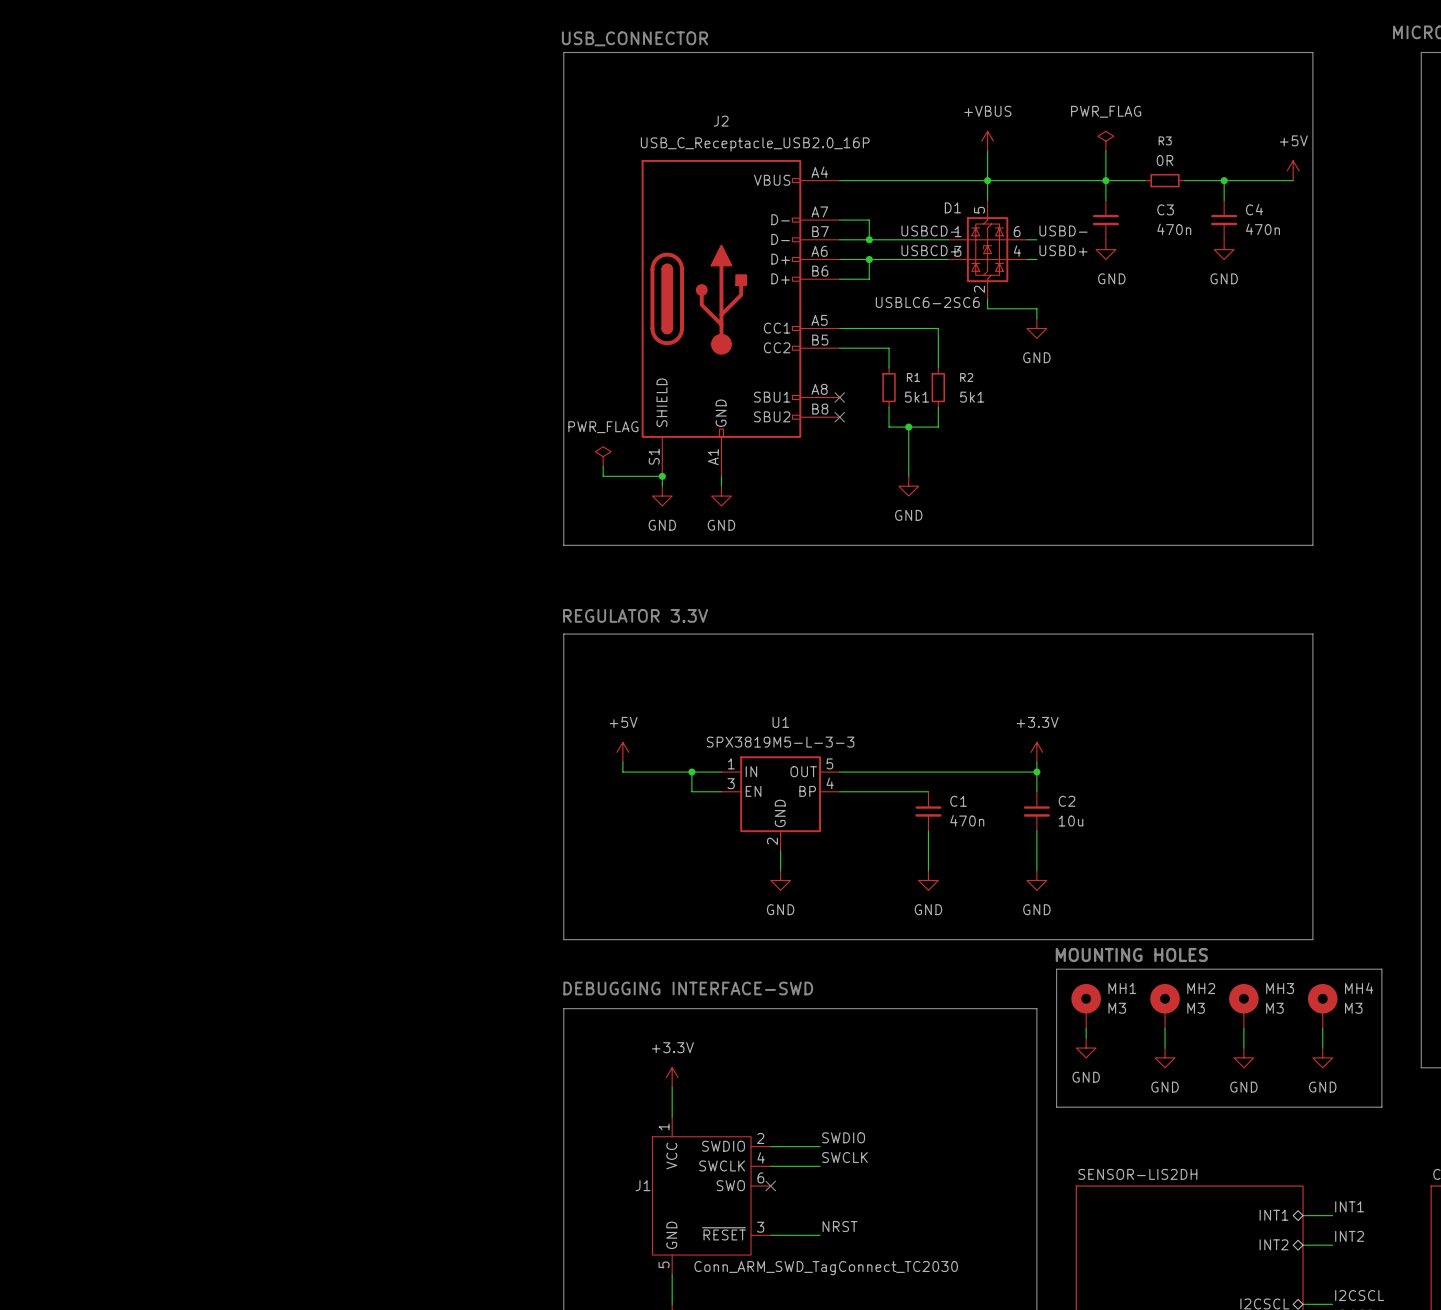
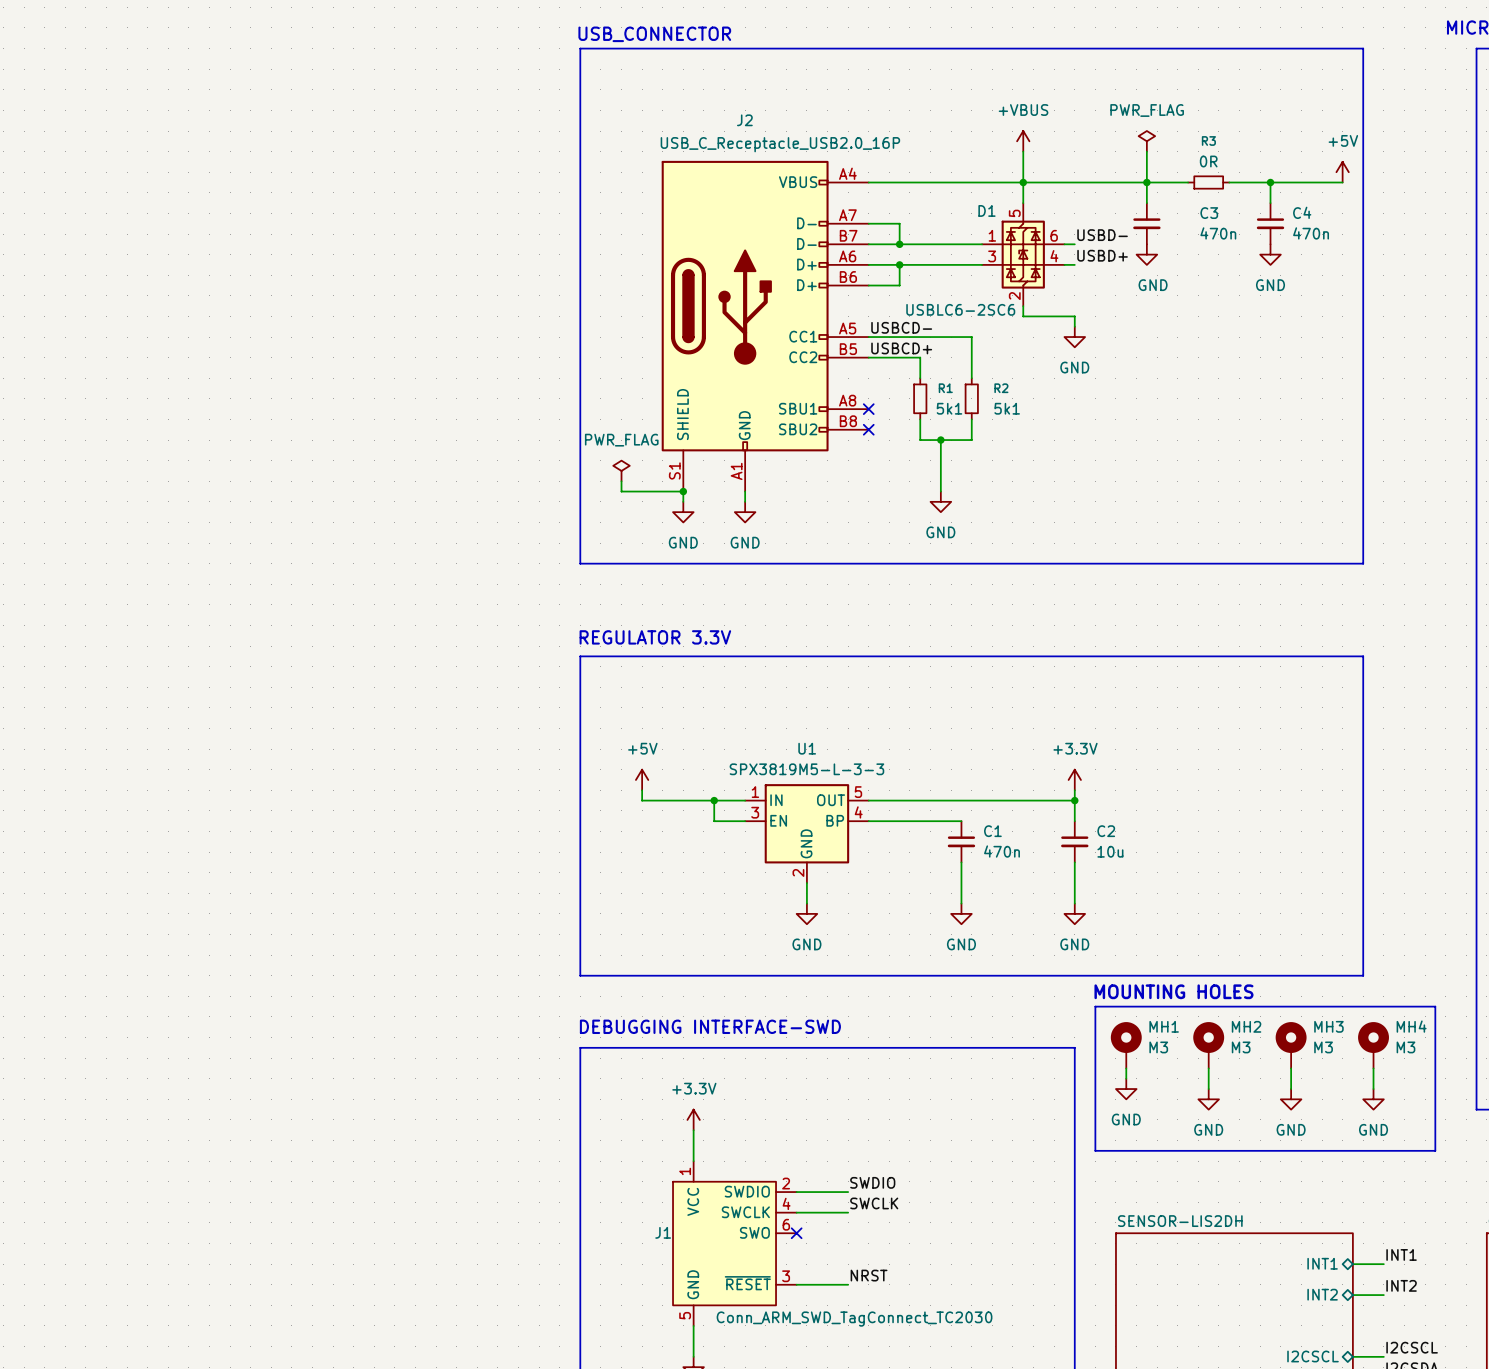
label position: USBCD- (930, 230) -> USBCD- (901, 327)
label position: USBCD+ (930, 250) -> USBCD+ (901, 348)

